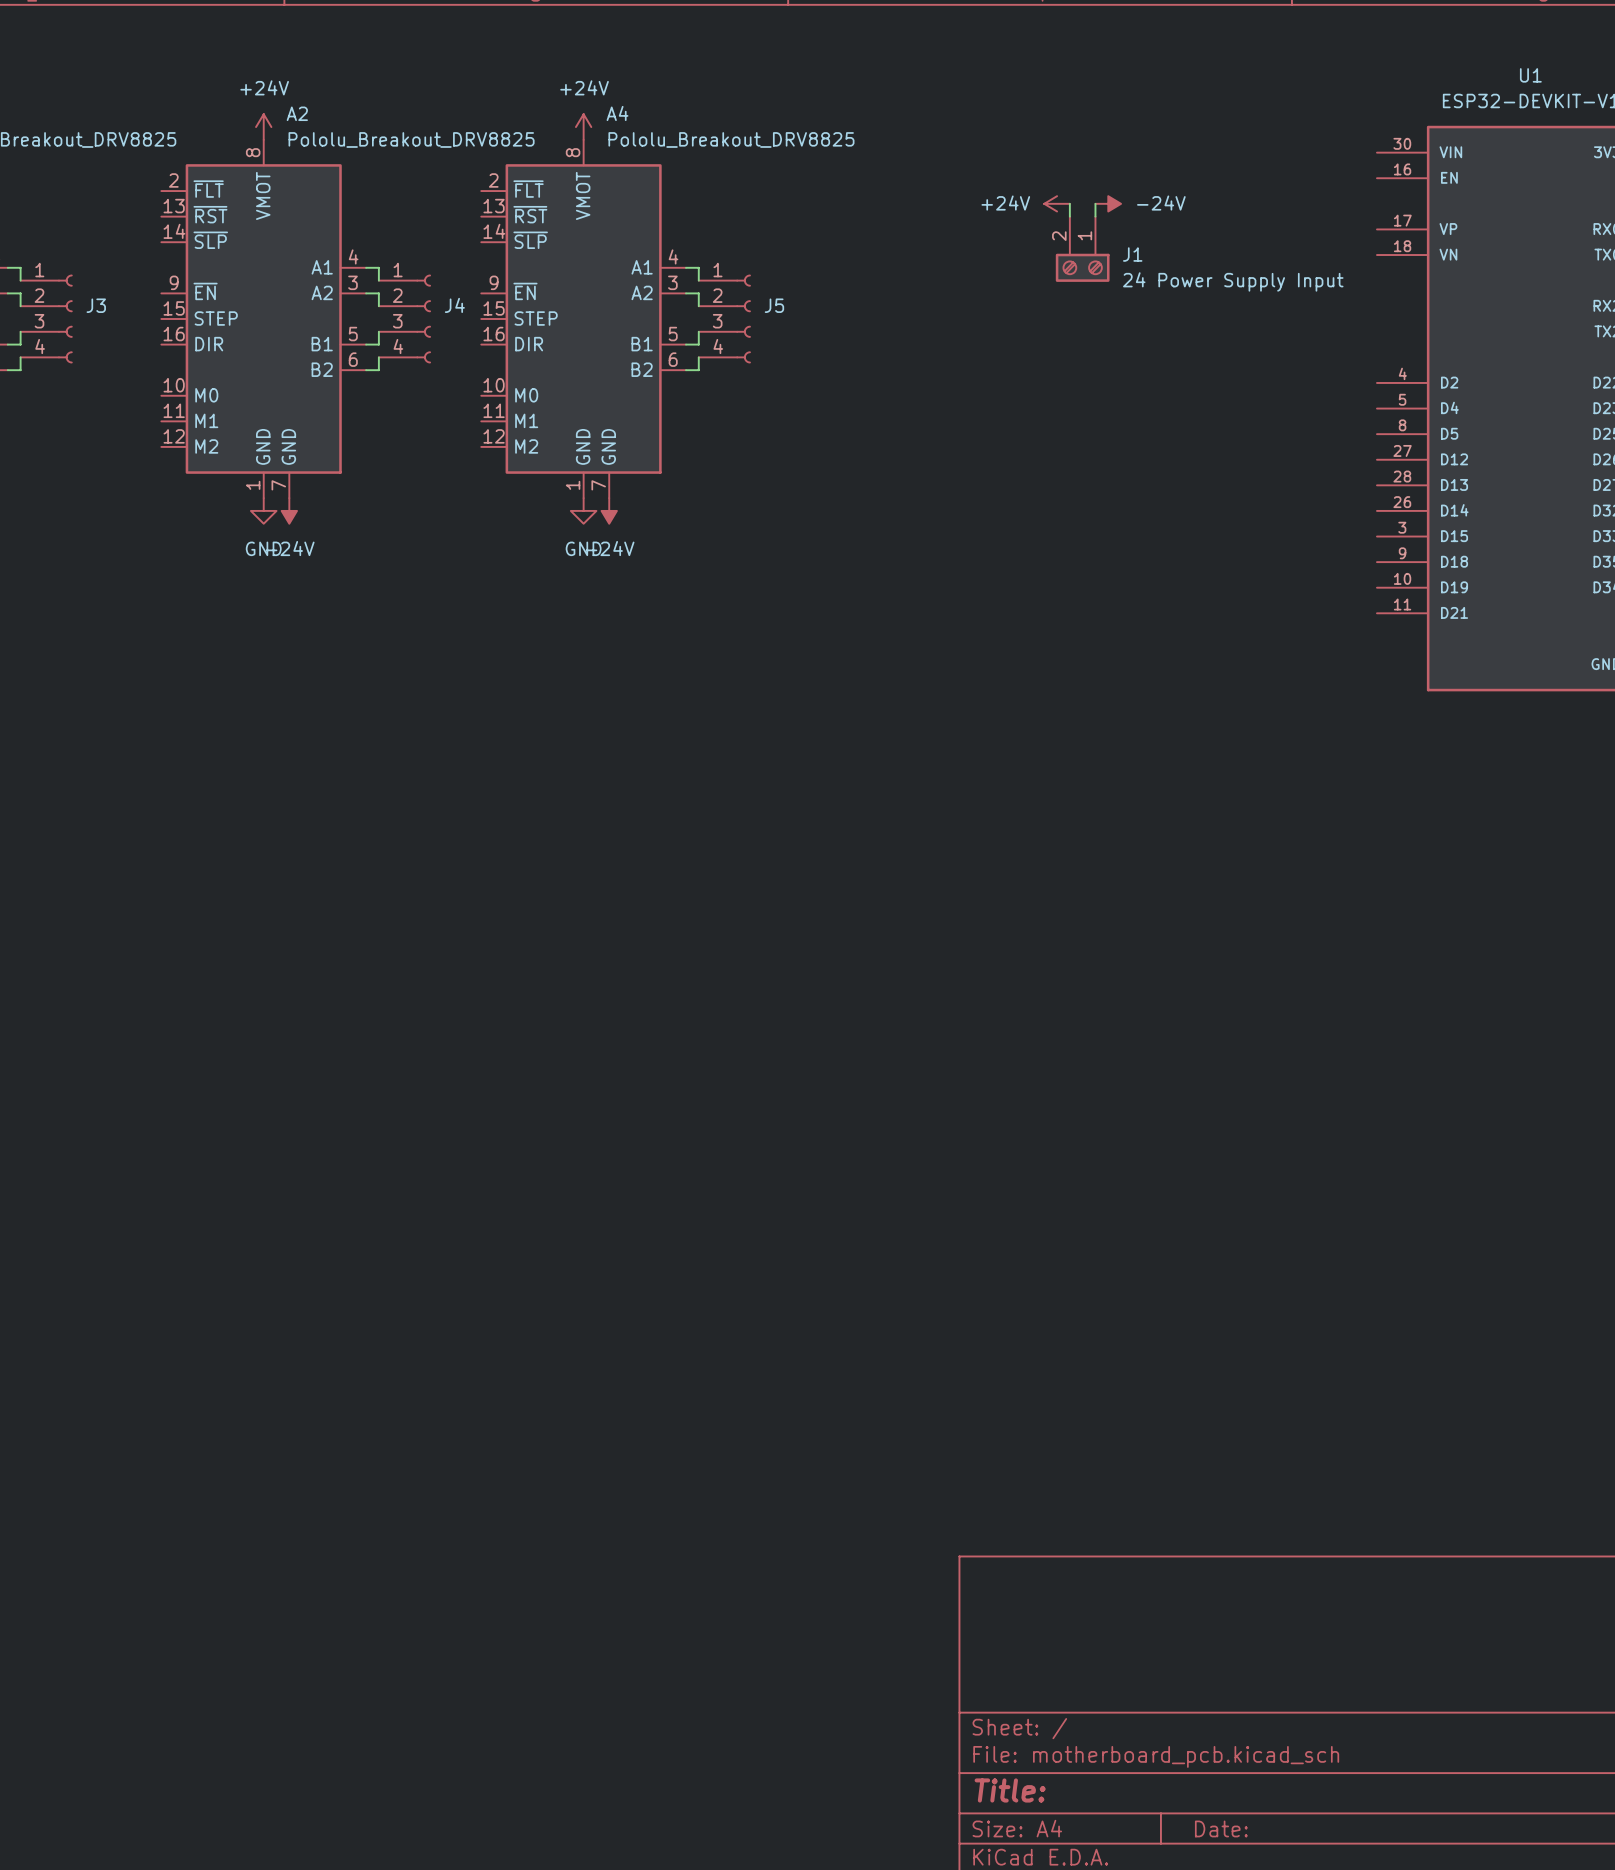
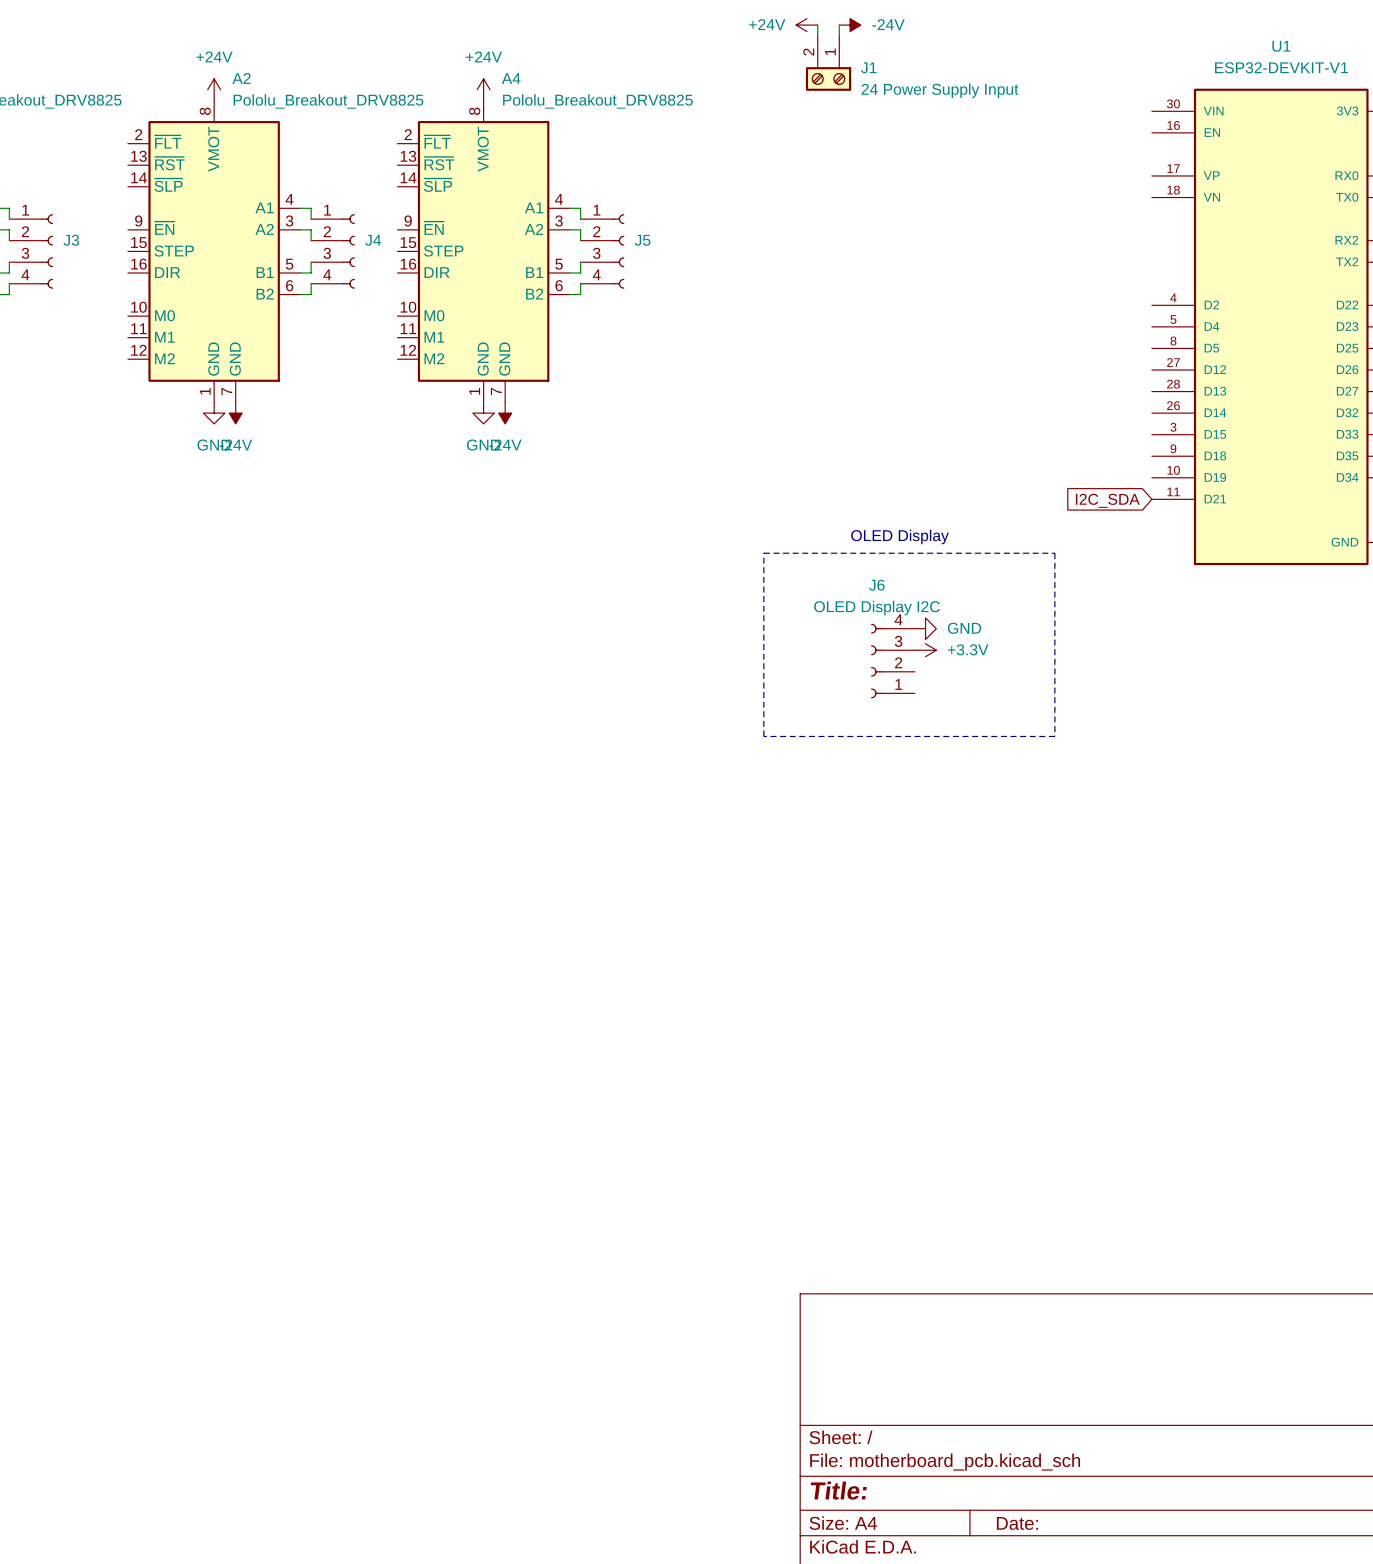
power symbol position: +24V (1057, 203) -> +24V (806, 25)
wire: (1069, 203) (1069, 216) -> (817, 25) (817, 35)
wire: (1095, 203) (1095, 216) -> (839, 25) (839, 35)
power symbol position: -24V (1108, 203) -> -24V (850, 25)
J1 position: (1082, 249) -> (828, 63)
global label: none -> I2C_SDA (1107, 500)
text: none -> OLED Display (900, 536)
line: none -> (763, 553) (1054, 553) (1054, 736) (763, 736) (763, 553)
power symbol: none -> GND (925, 628)
power symbol: none -> +3.3V (925, 650)
J6: none -> OLED Display I2C (892, 661)

